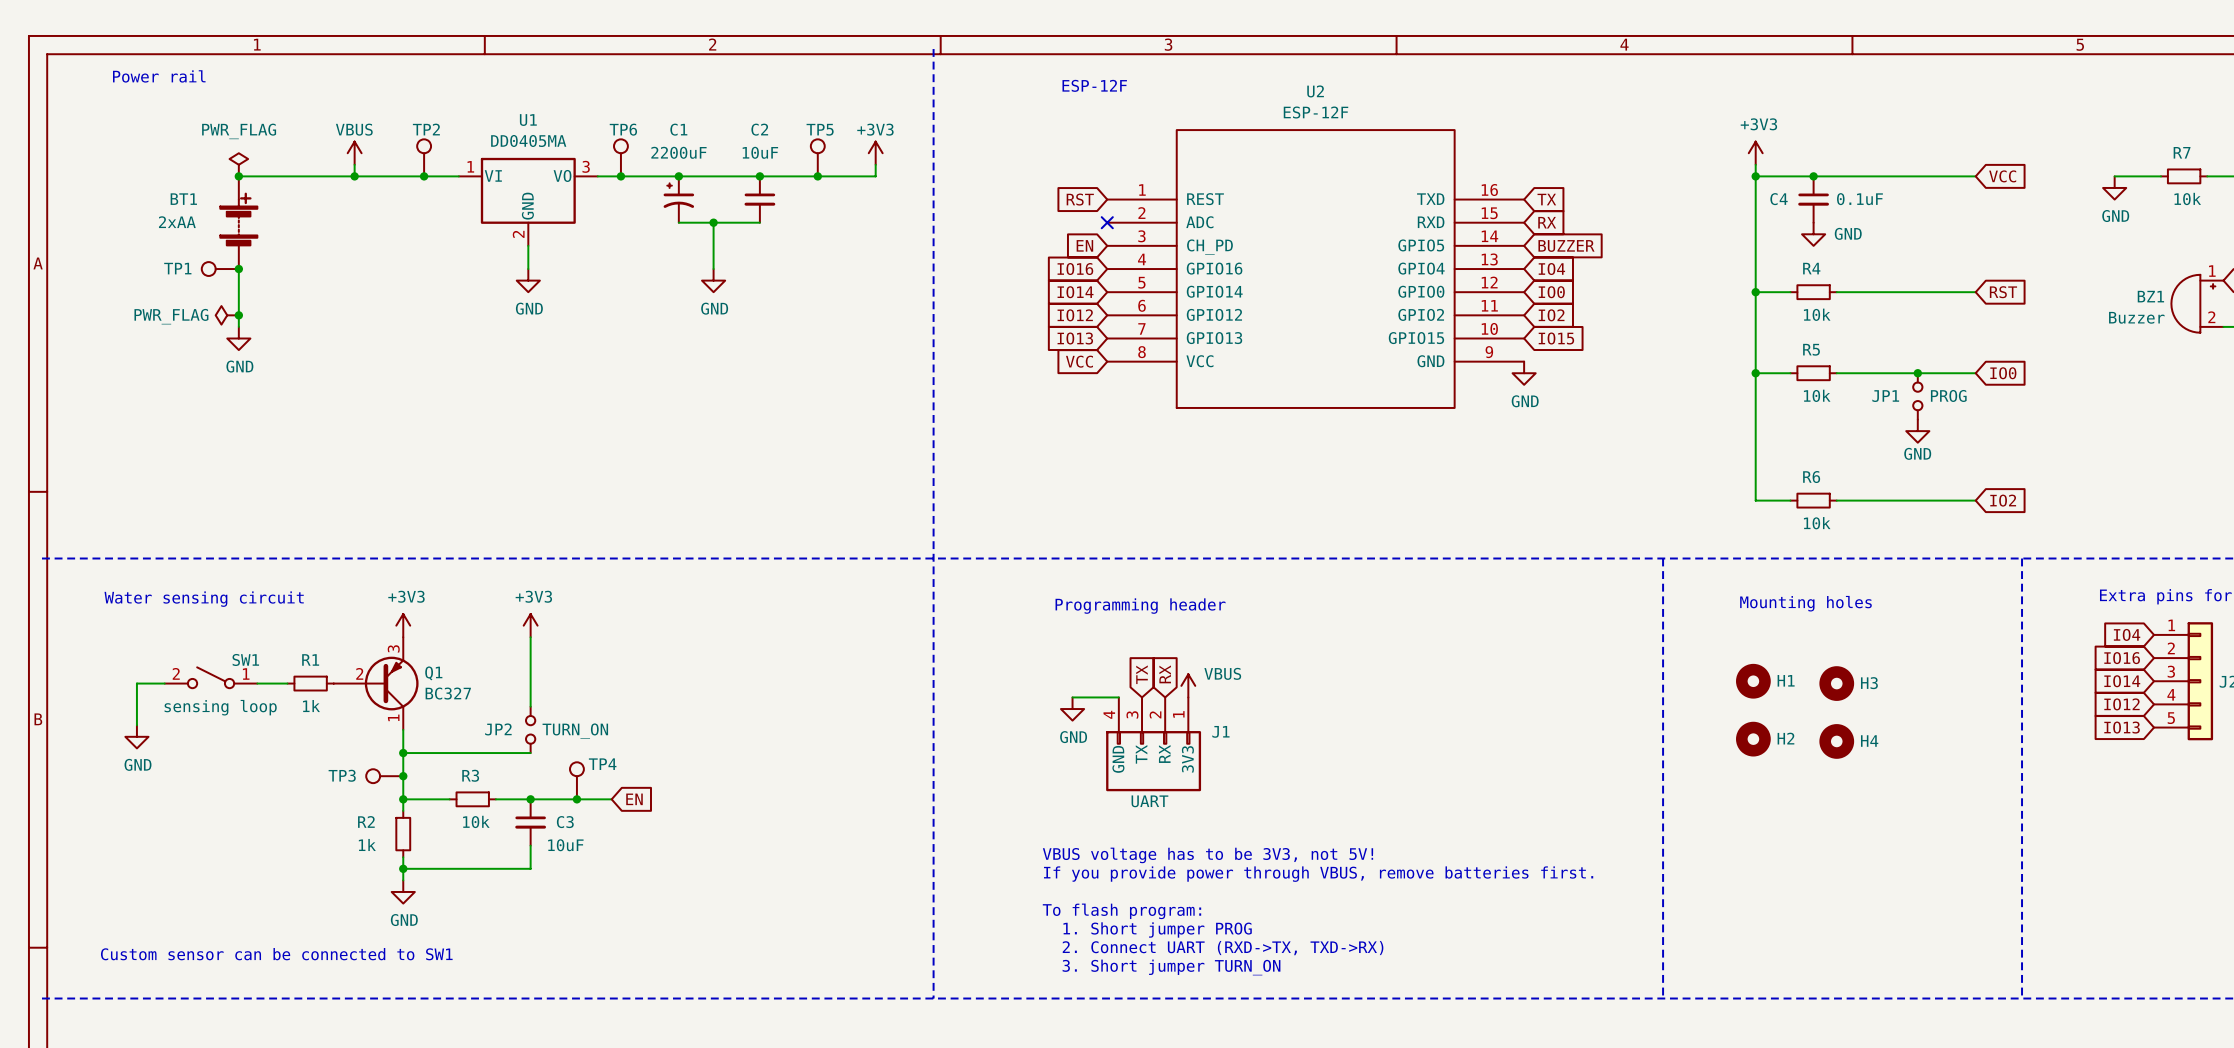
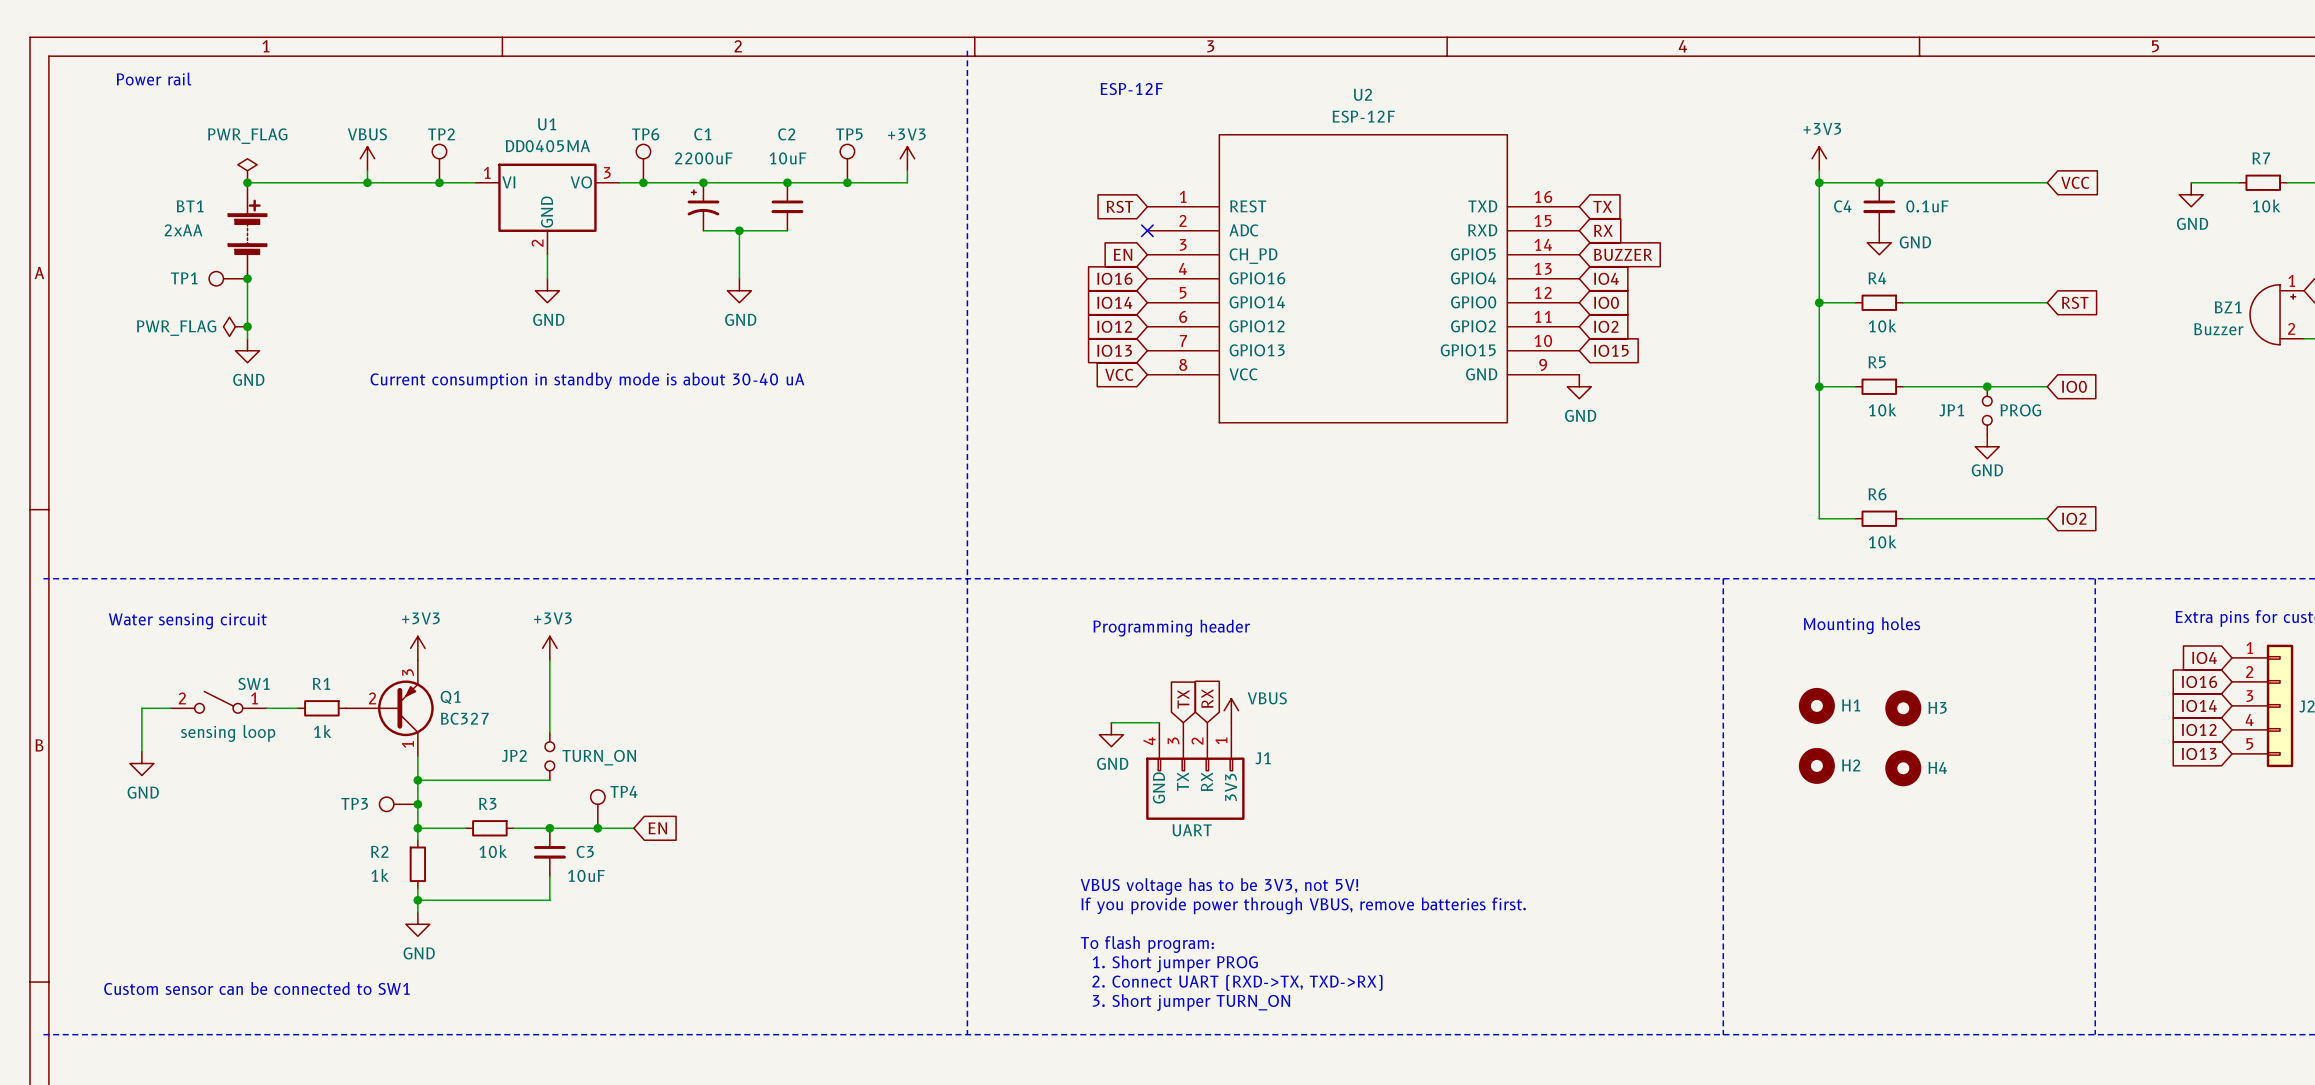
text: none -> Current consumption in standby mode is about 30-40 uA (587, 380)

